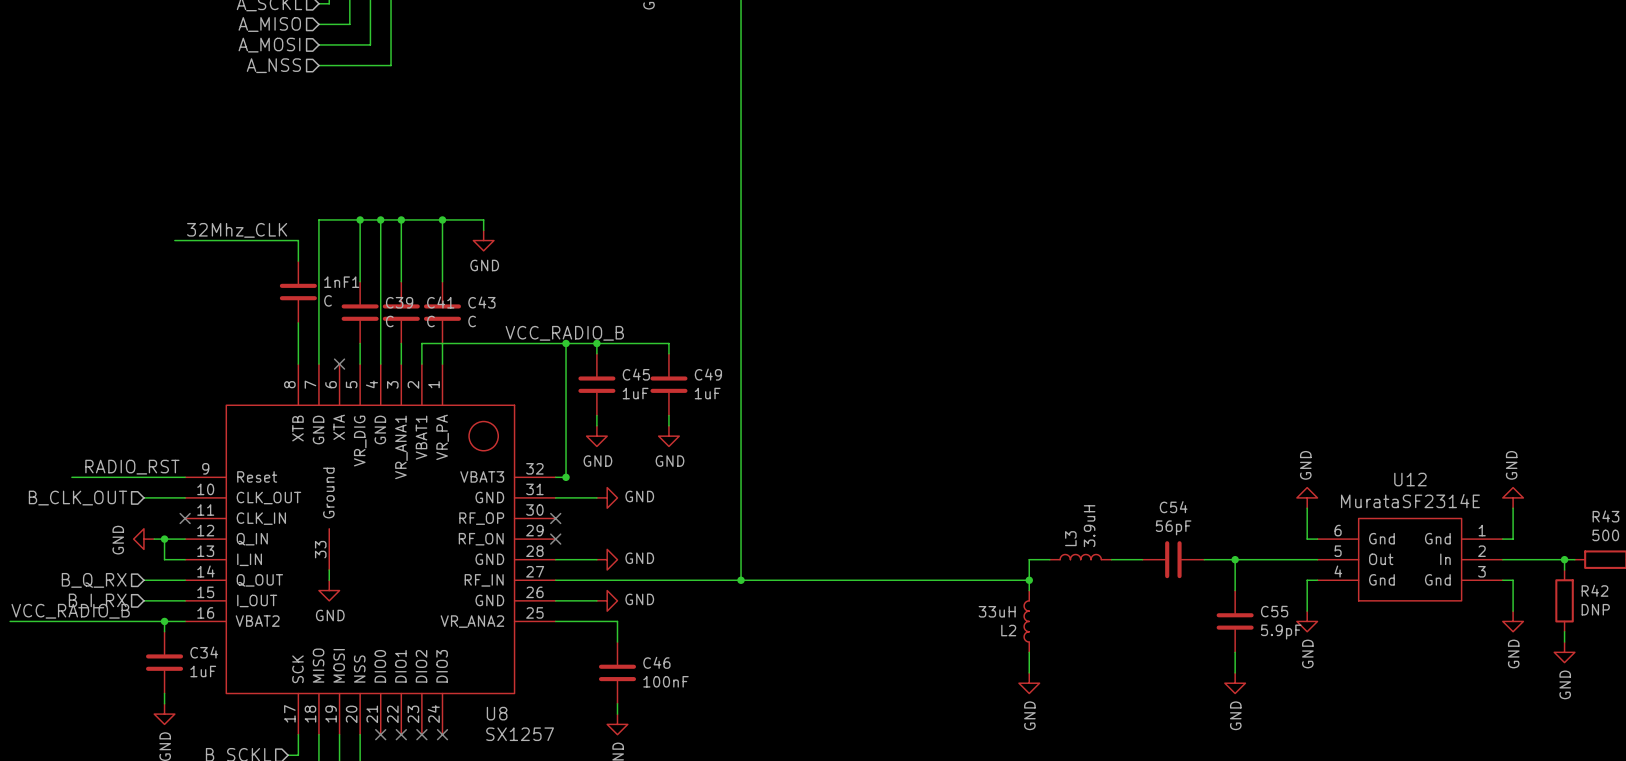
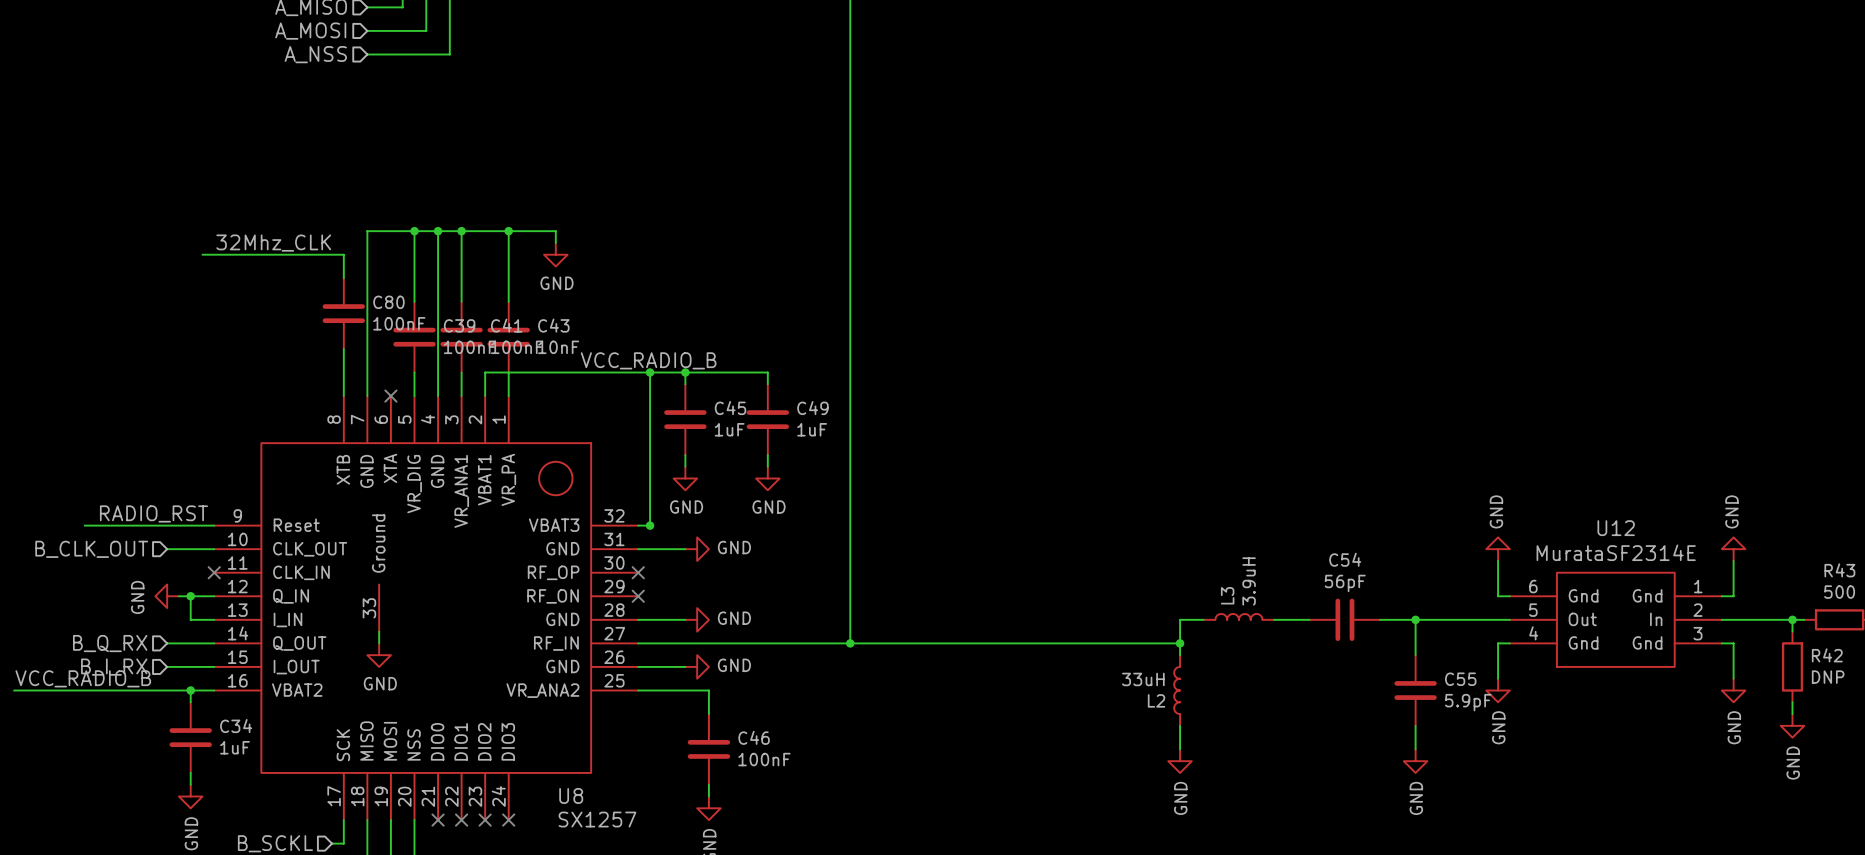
1nF1 name: 1nF1 (341, 282) -> C80 (388, 302)
1nF1 value: C (328, 300) -> 100nF (399, 323)
C39 value: C (389, 321) -> 100nF (469, 347)
C41 value: C (430, 321) -> 100nF (517, 347)
C43 value: C (472, 321) -> 10nF (558, 347)

